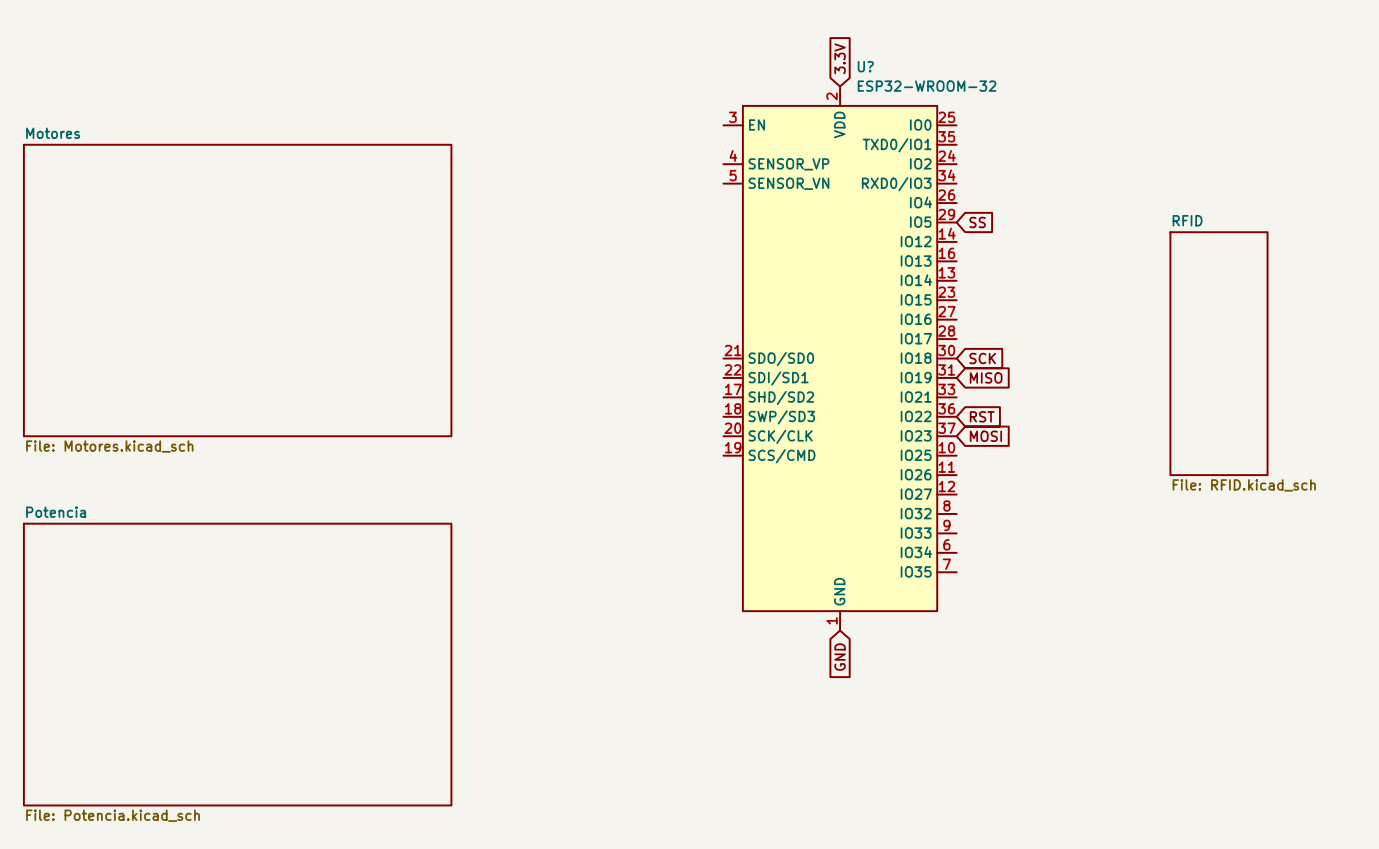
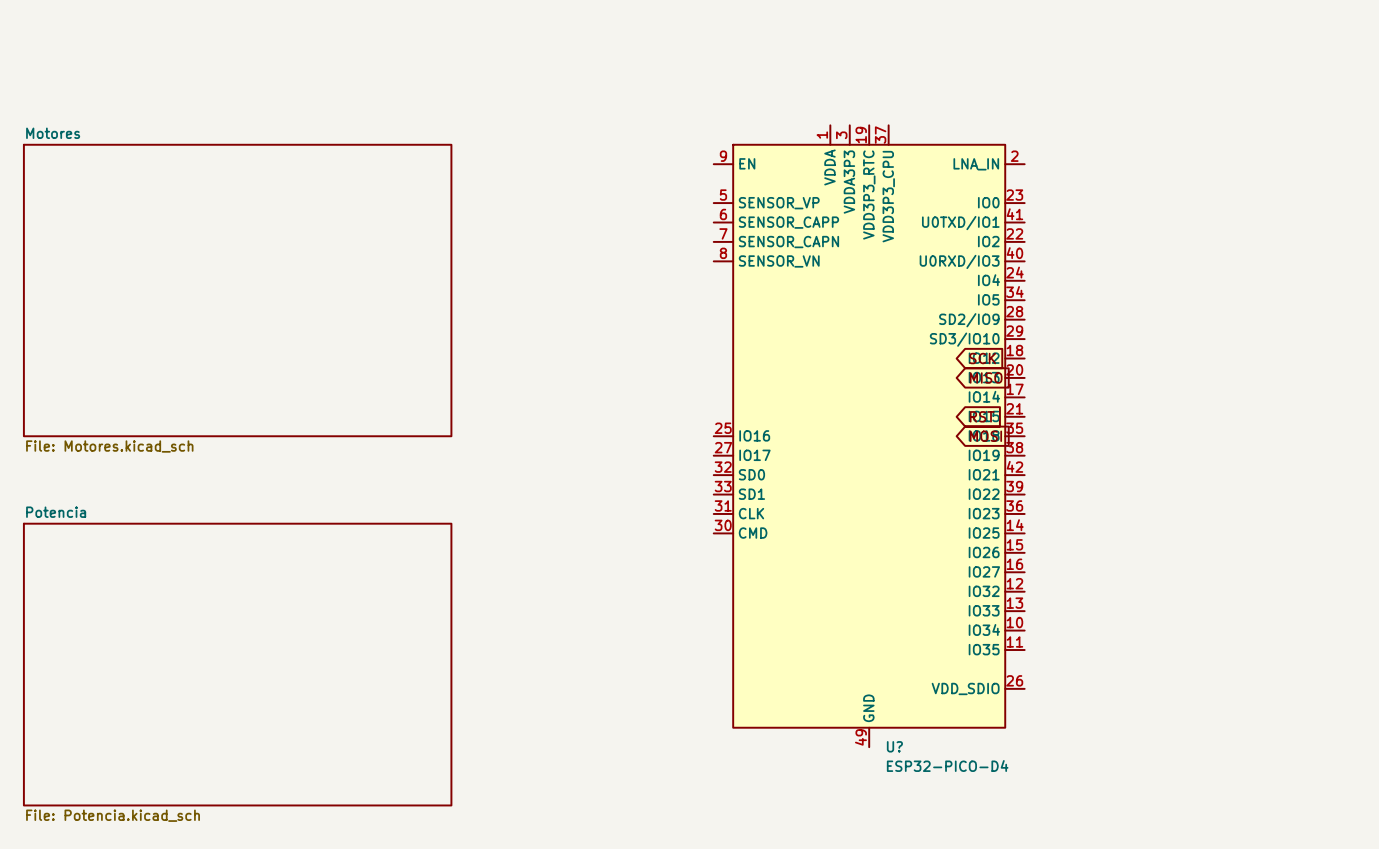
global label: 3.3V (840, 58) -> none
global label: SS (977, 222) -> none
sheet RFID: File: RFID.kicad_sch (1218, 353) -> none
U?: ESP32-WROOM-32 (840, 358) -> none
U?: none -> ESP32-PICO-D4 (869, 436)
global label: GND (840, 657) -> none

